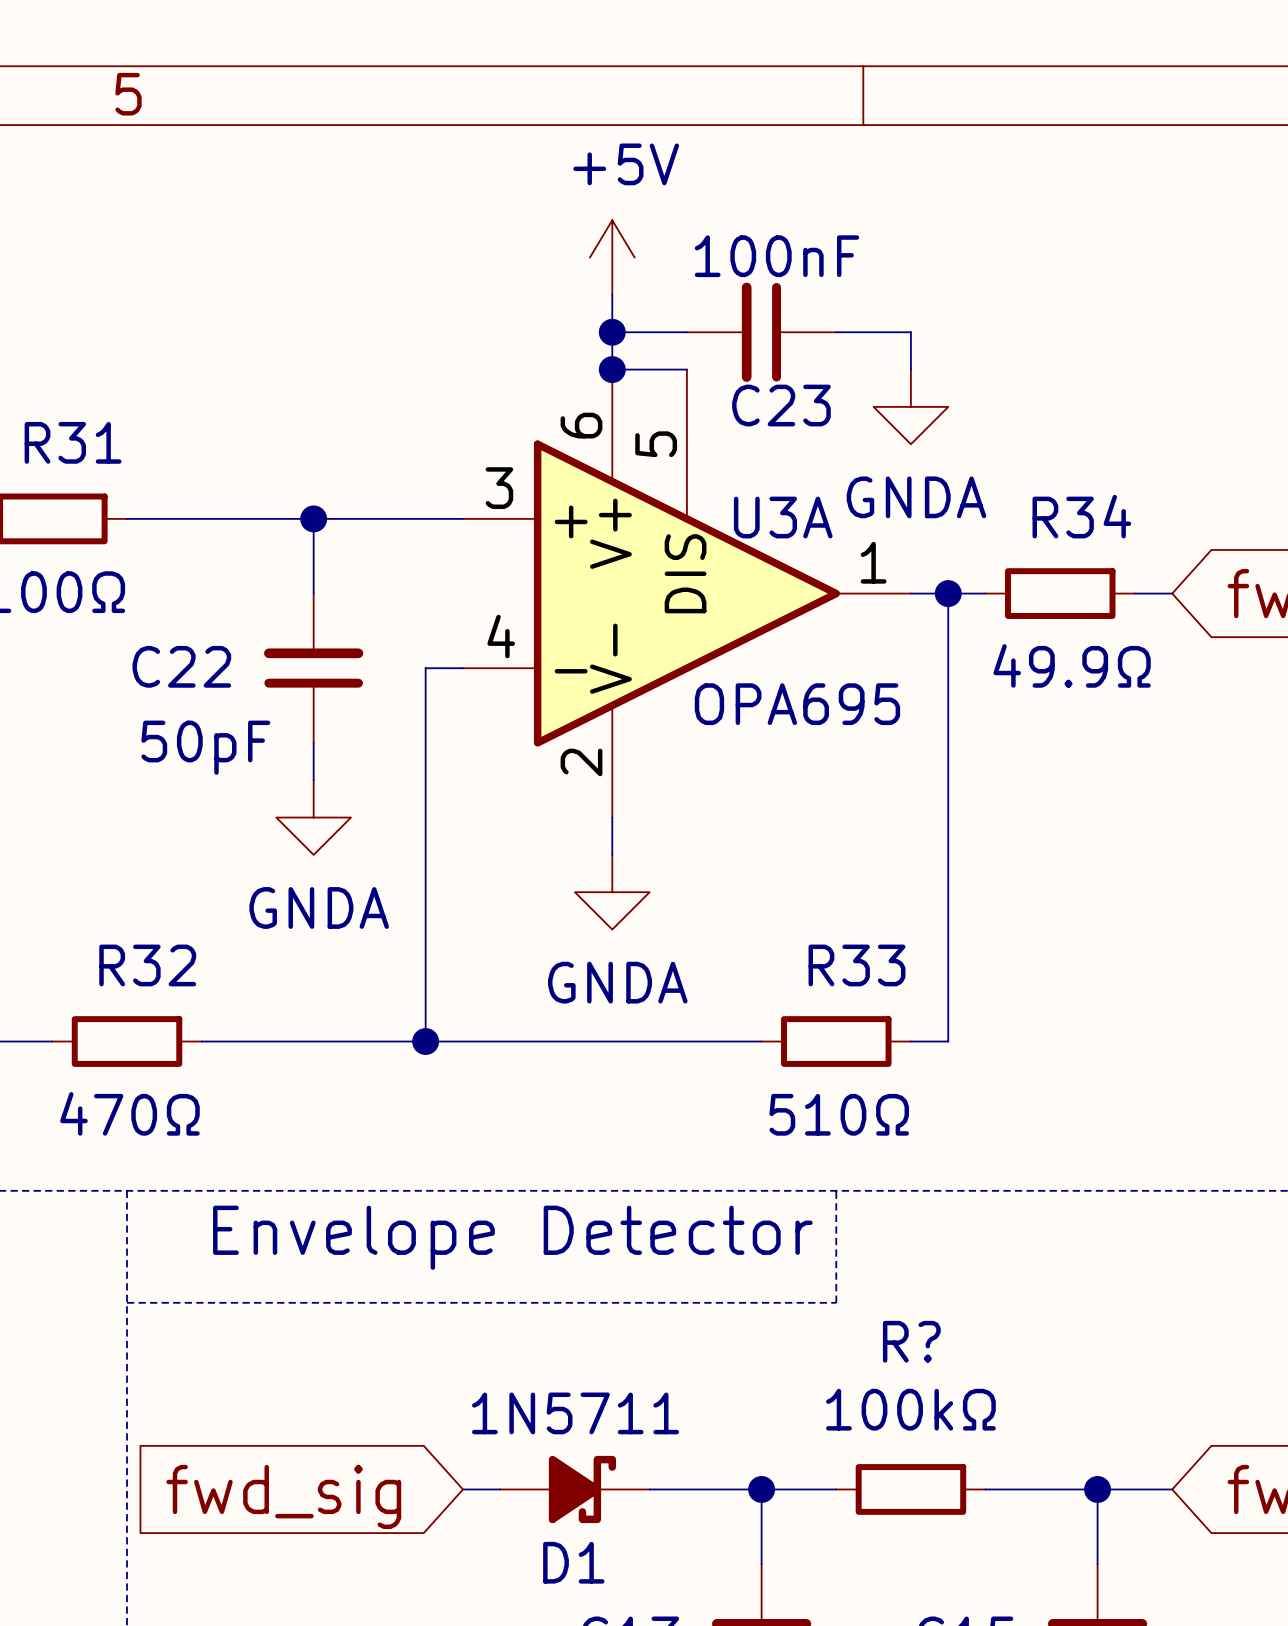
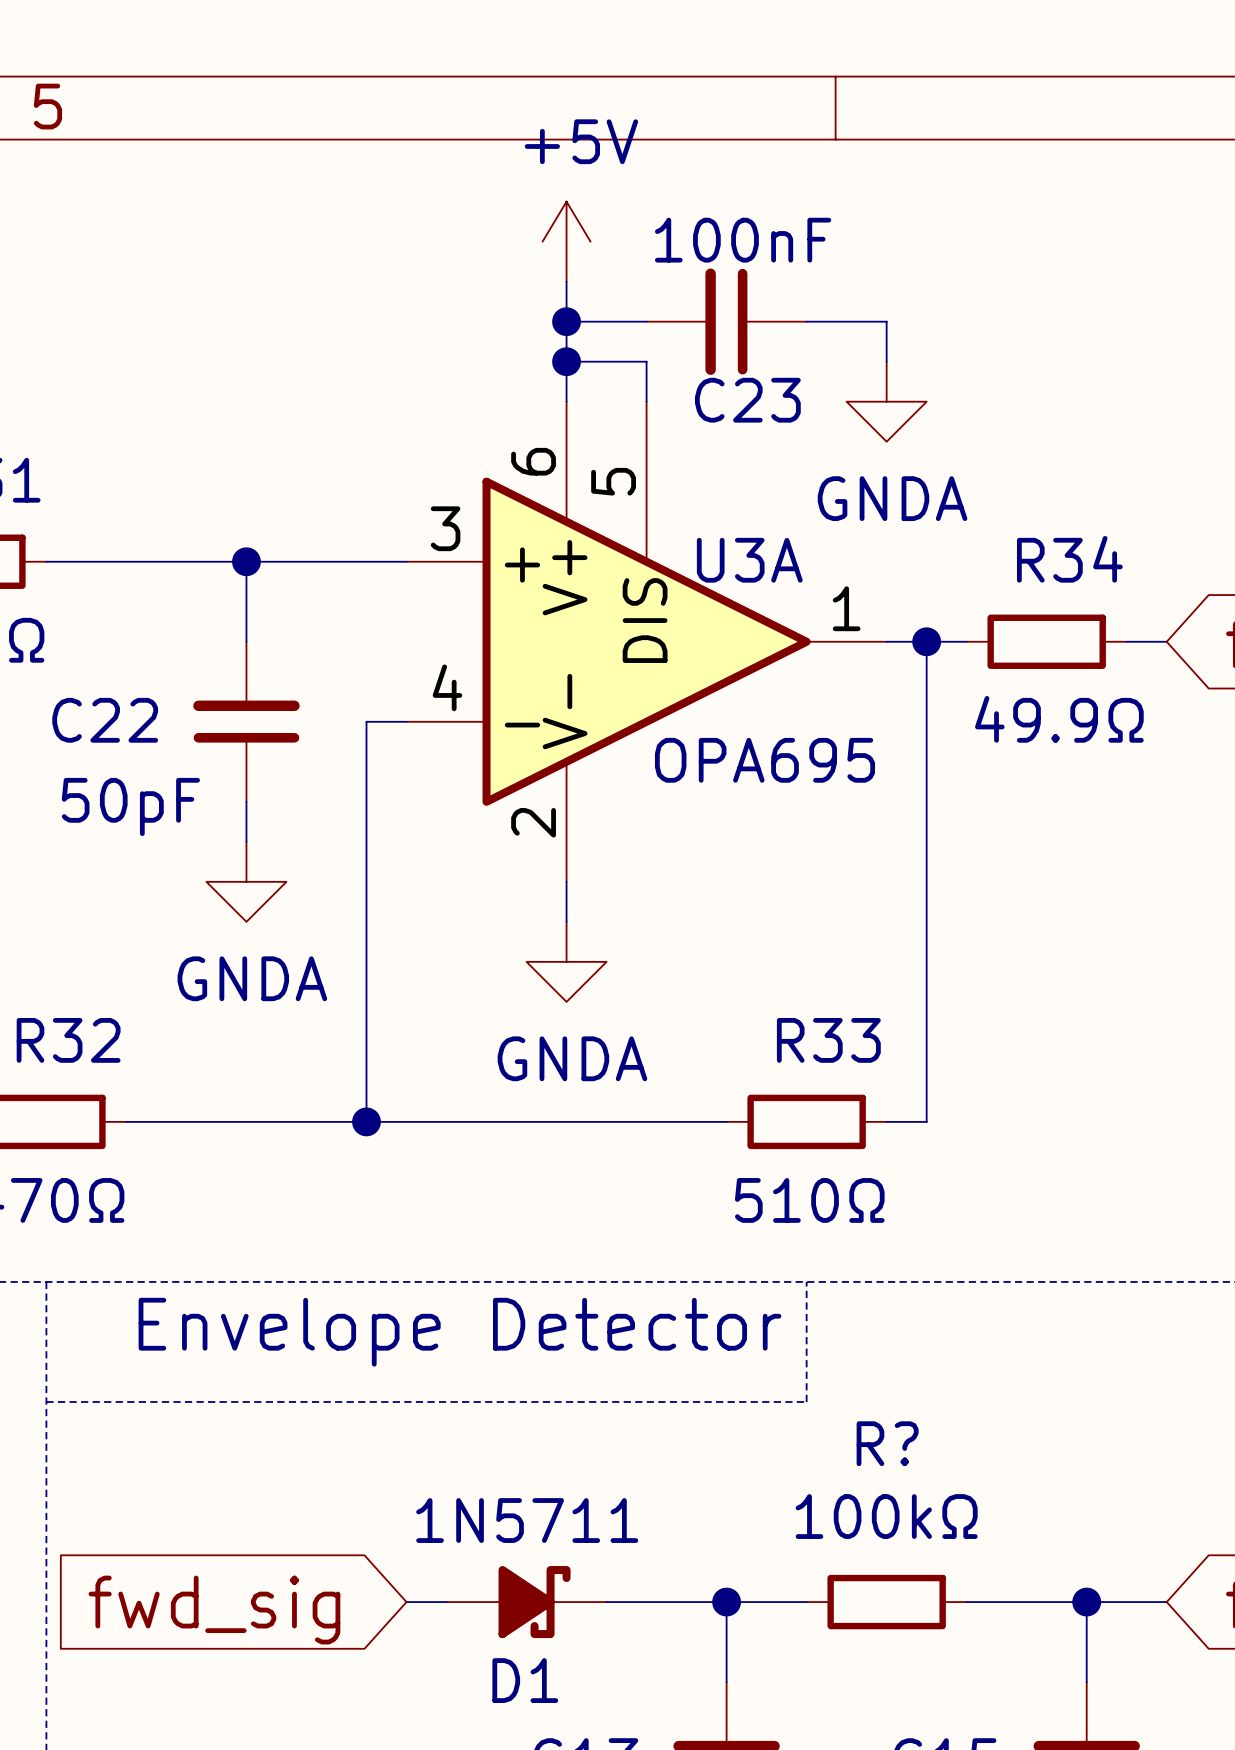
wire: none -> (566, 281) (566, 321) (646, 321)
power symbol position: +5V (612, 257) -> +5V (566, 241)
C23 position: (761, 332) -> (726, 321)
wire: (836, 332) (910, 332) (910, 369) -> (806, 321) (886, 321) (886, 361)
wire: (612, 369) (686, 369) -> (646, 361) (646, 401)
junction position: (612, 369) -> (566, 321)
power symbol position: GNDA (910, 406) -> GNDA (886, 401)

